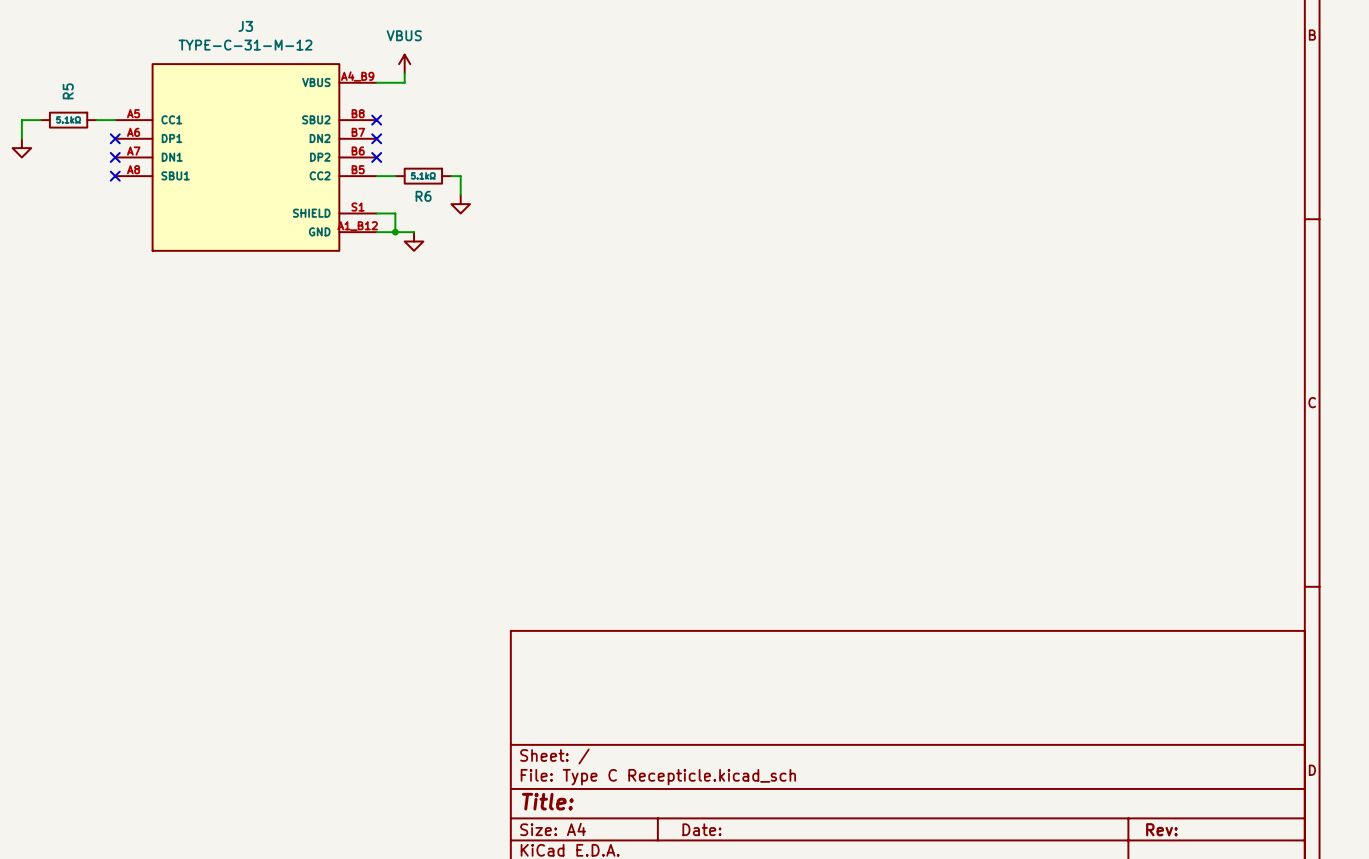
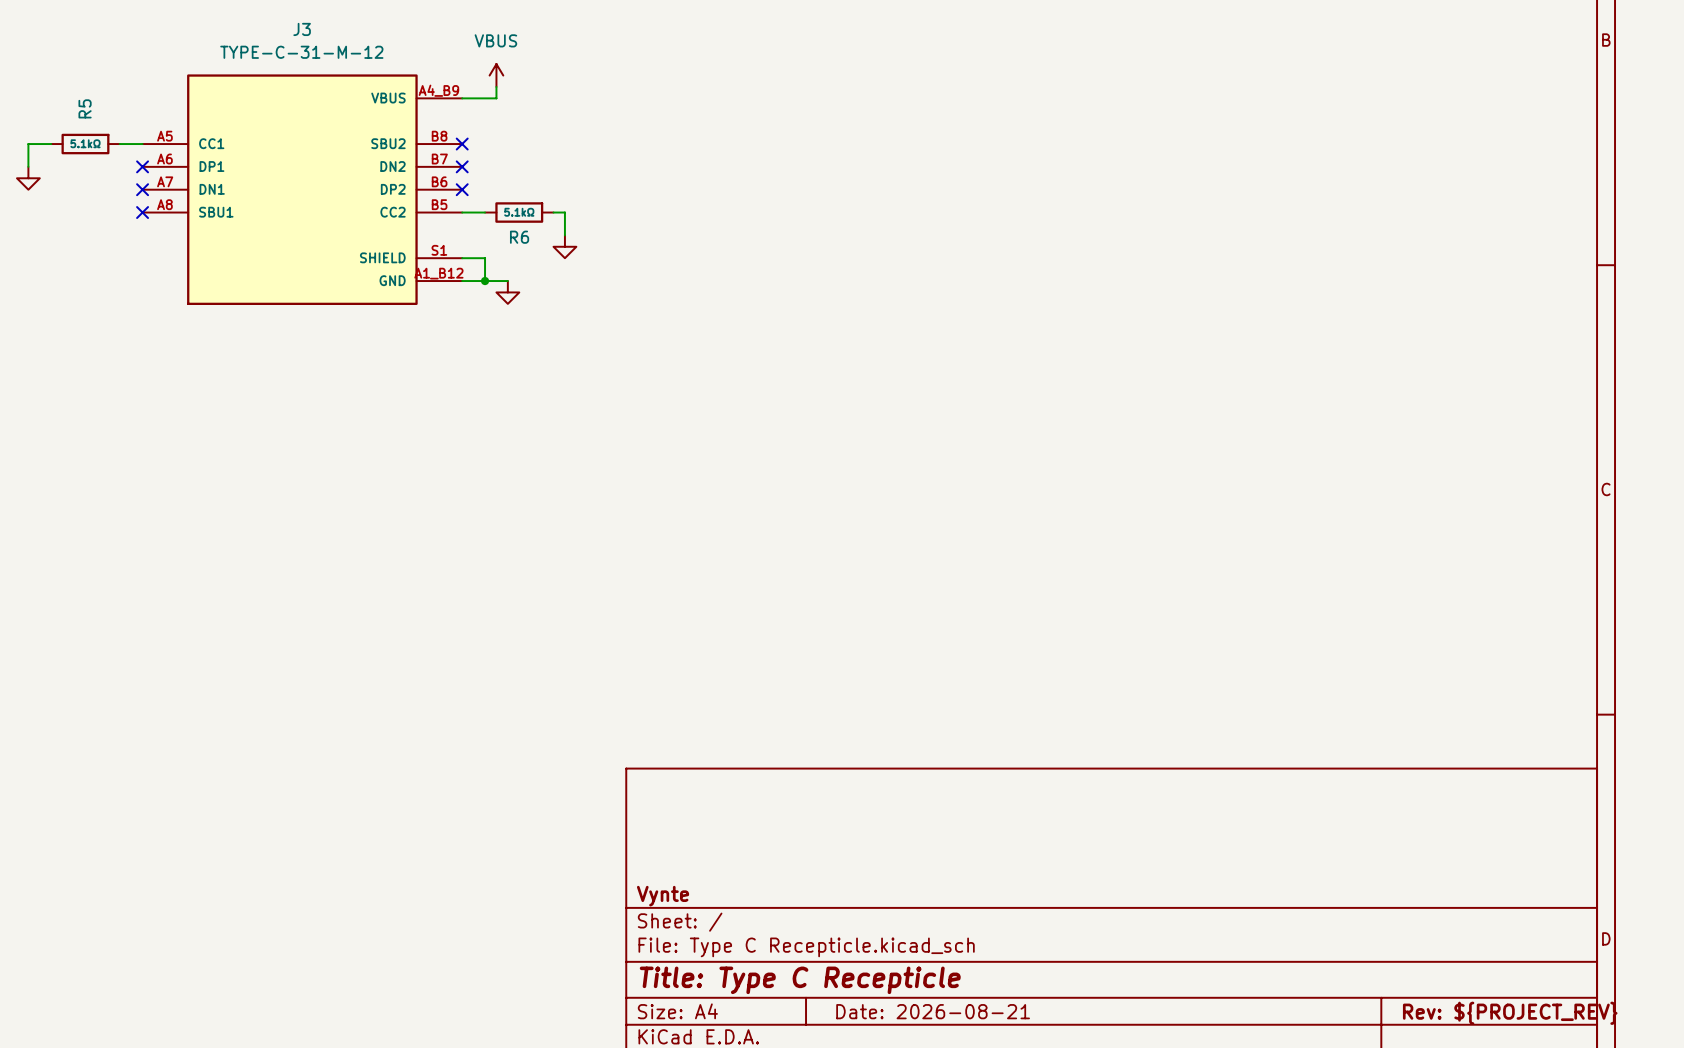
title block: none -> Vynte (663, 896)
title block: Title: (547, 801) -> Title: Type C Recepticle (800, 980)
title block: Date: (701, 829) -> Date: 2026-08-21 (933, 1011)
title block: Rev: (1161, 829) -> Rev: ${PROJECT_REV} (1510, 1013)

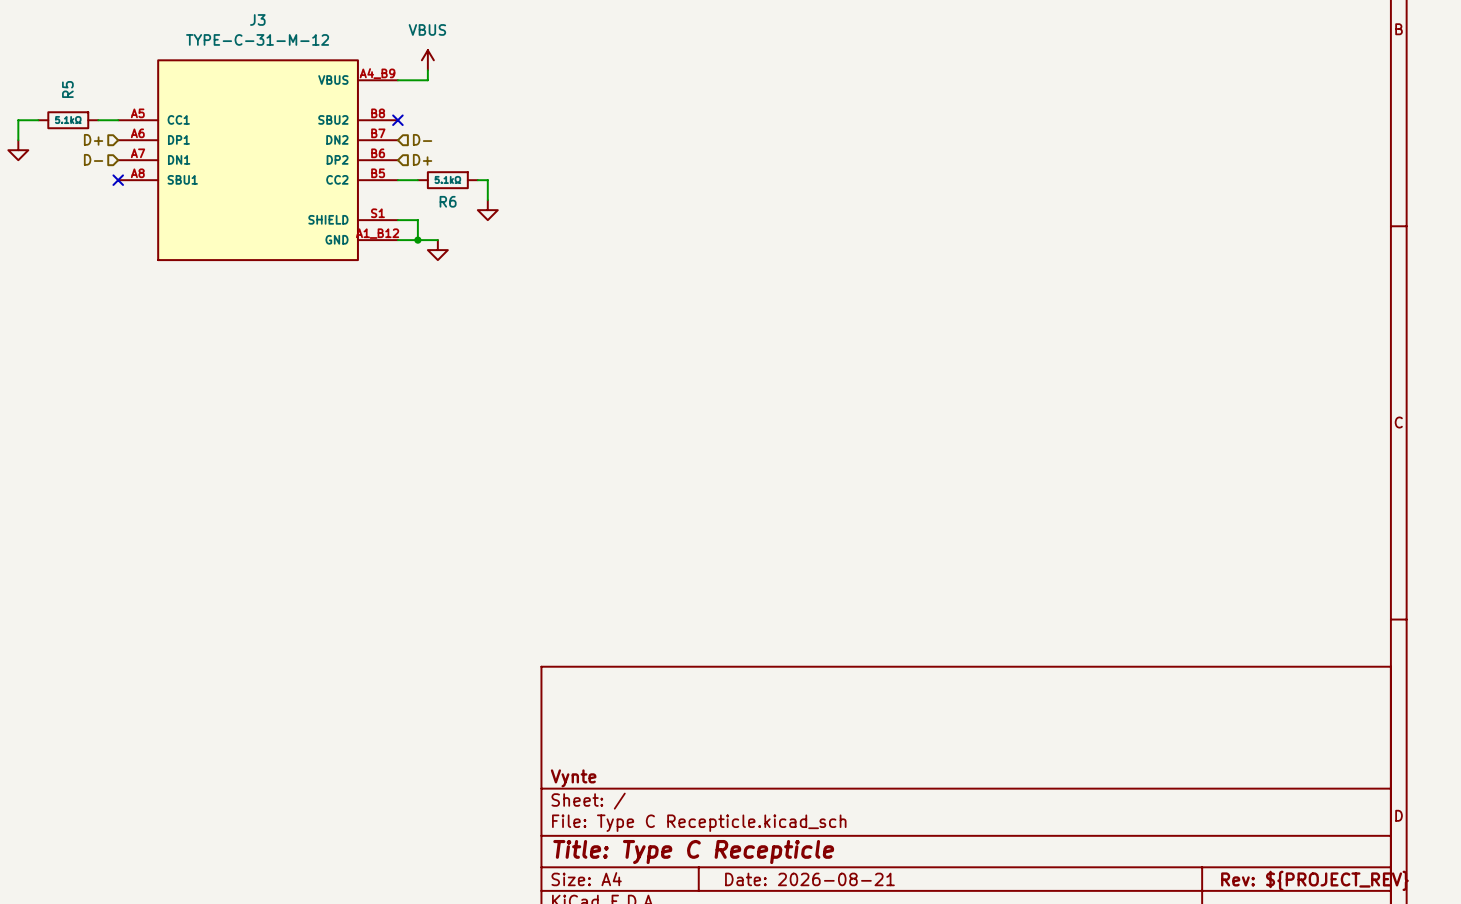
hierarchical label: none -> D+ (93, 139)
no-connect mark: (142, 166) -> none
no-connect mark: (462, 166) -> none
hierarchical label: none -> D- (422, 139)
hierarchical label: none -> D- (93, 159)
no-connect mark: (142, 189) -> none
no-connect mark: (462, 189) -> none
hierarchical label: none -> D+ (422, 159)

